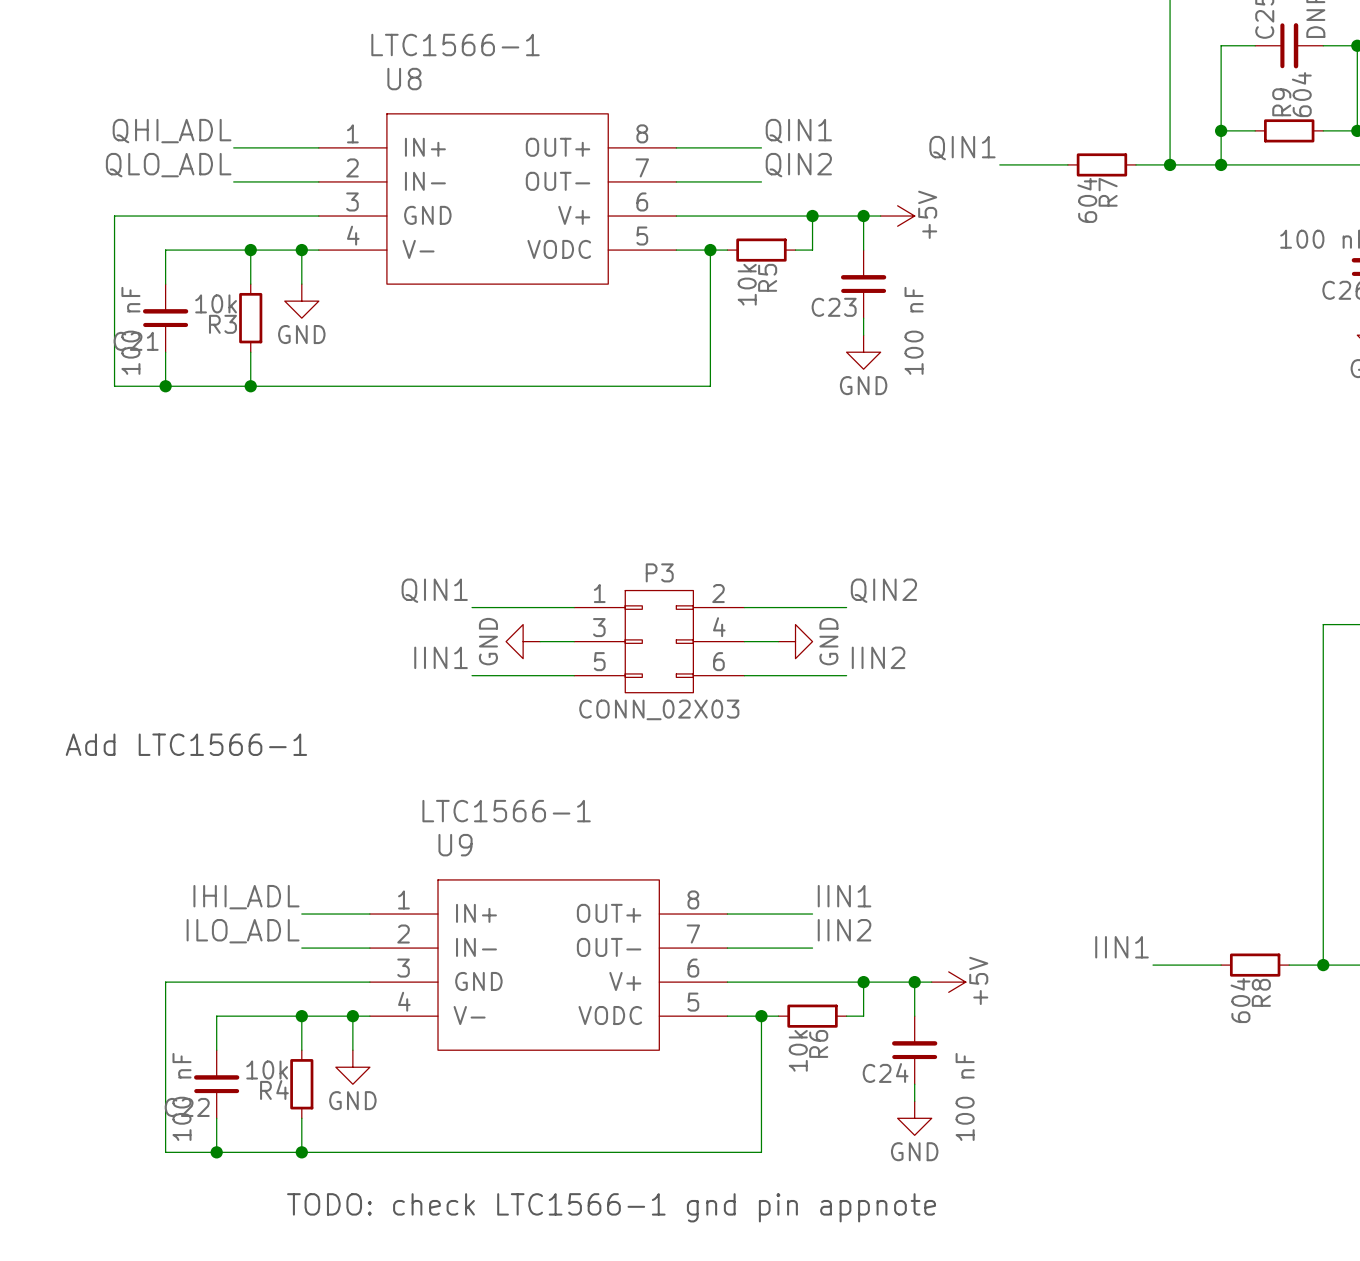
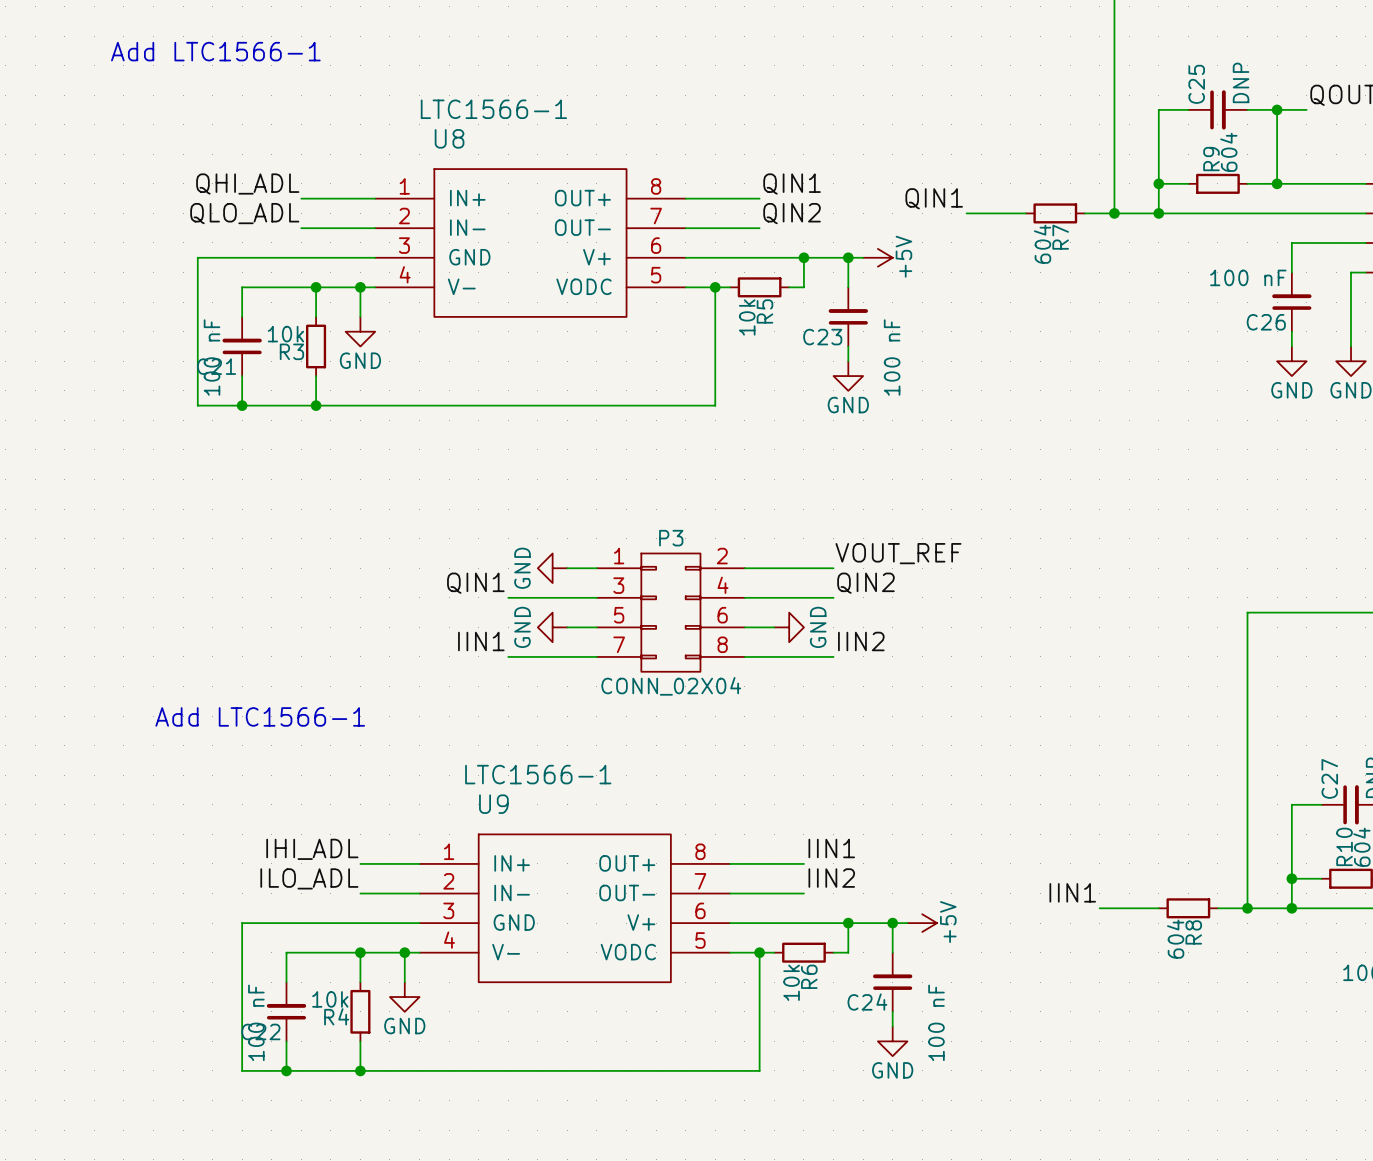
label: none -> VOUT_REF (898, 553)
power symbol: none -> GND (552, 568)
wire: none -> (567, 568) (596, 568)
wire: none -> (744, 568) (833, 568)
P3 symbol: [574, 590, 745, 693] -> [596, 553, 745, 672]
P3 value: CONN_02X03 (659, 709) -> CONN_02X04 (671, 686)
text: TODO: check LTC1566-1 gnd pin appnote (611, 1207) -> none

